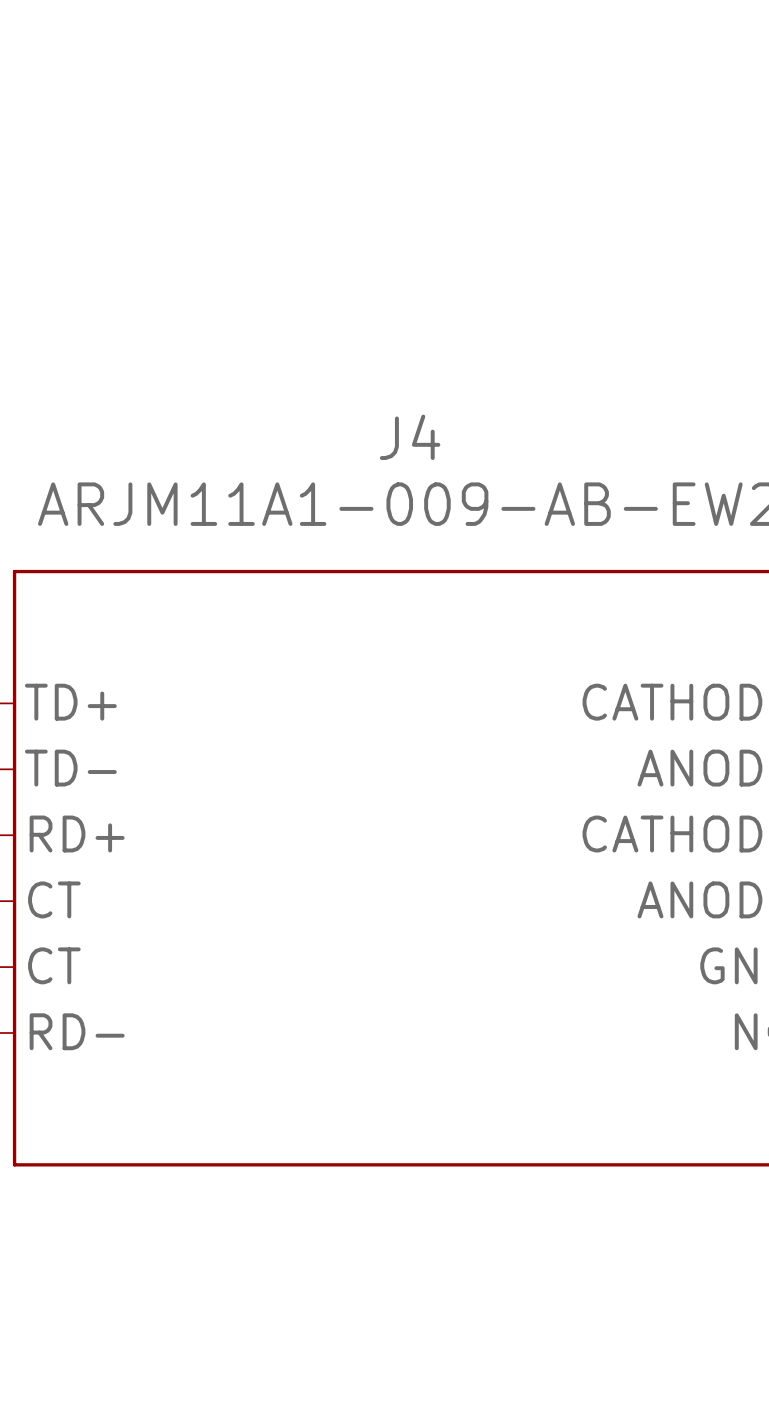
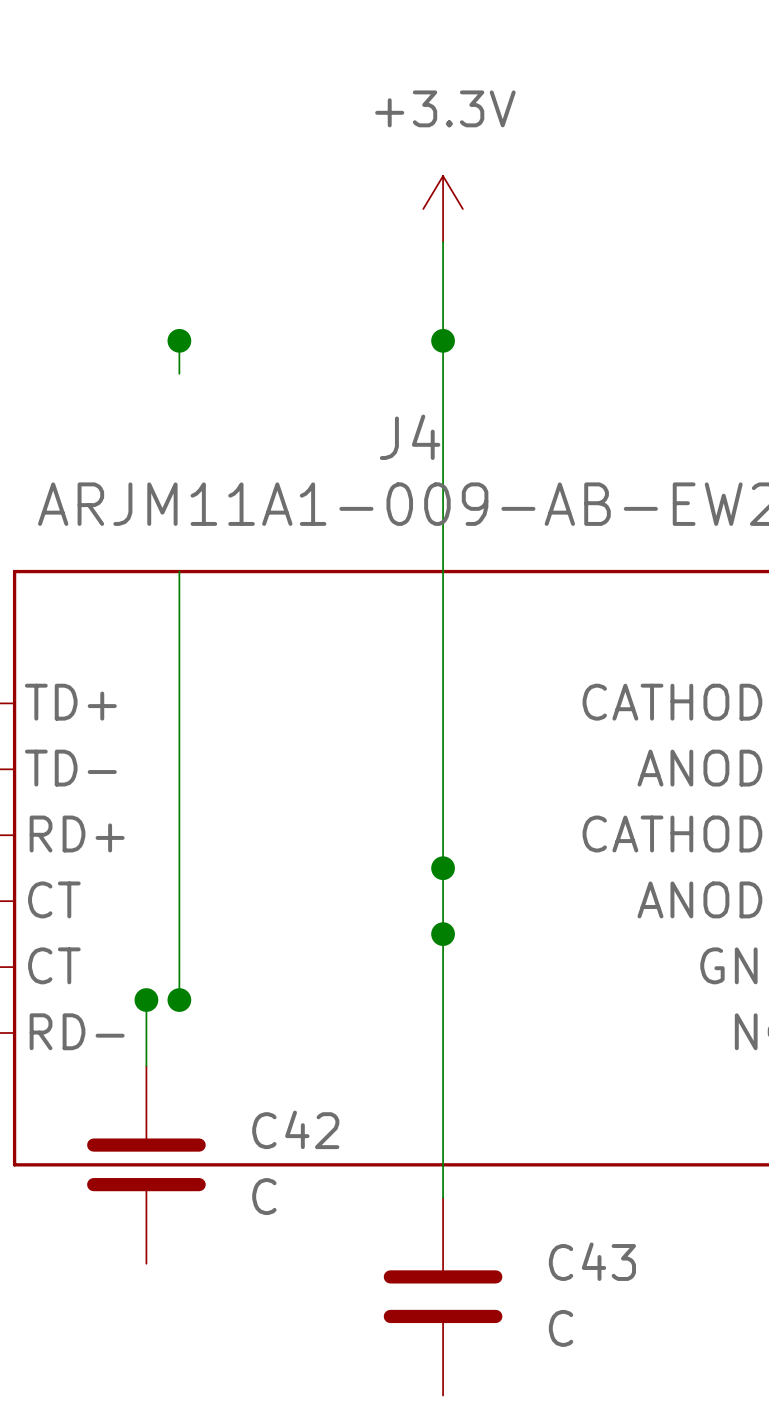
power symbol: none -> +3.3V (443, 208)
wire: none -> (443, 241) (443, 1197)
wire: none -> (179, 340) (179, 373)
junction: none -> (179, 340)
junction: none -> (443, 340)
wire: none -> (179, 571) (179, 1000)
junction: none -> (443, 868)
junction: none -> (443, 934)
wire: none -> (146, 1000) (146, 1065)
junction: none -> (146, 1000)
junction: none -> (179, 1000)
C42: none -> C (146, 1164)
C43: none -> C (443, 1296)

